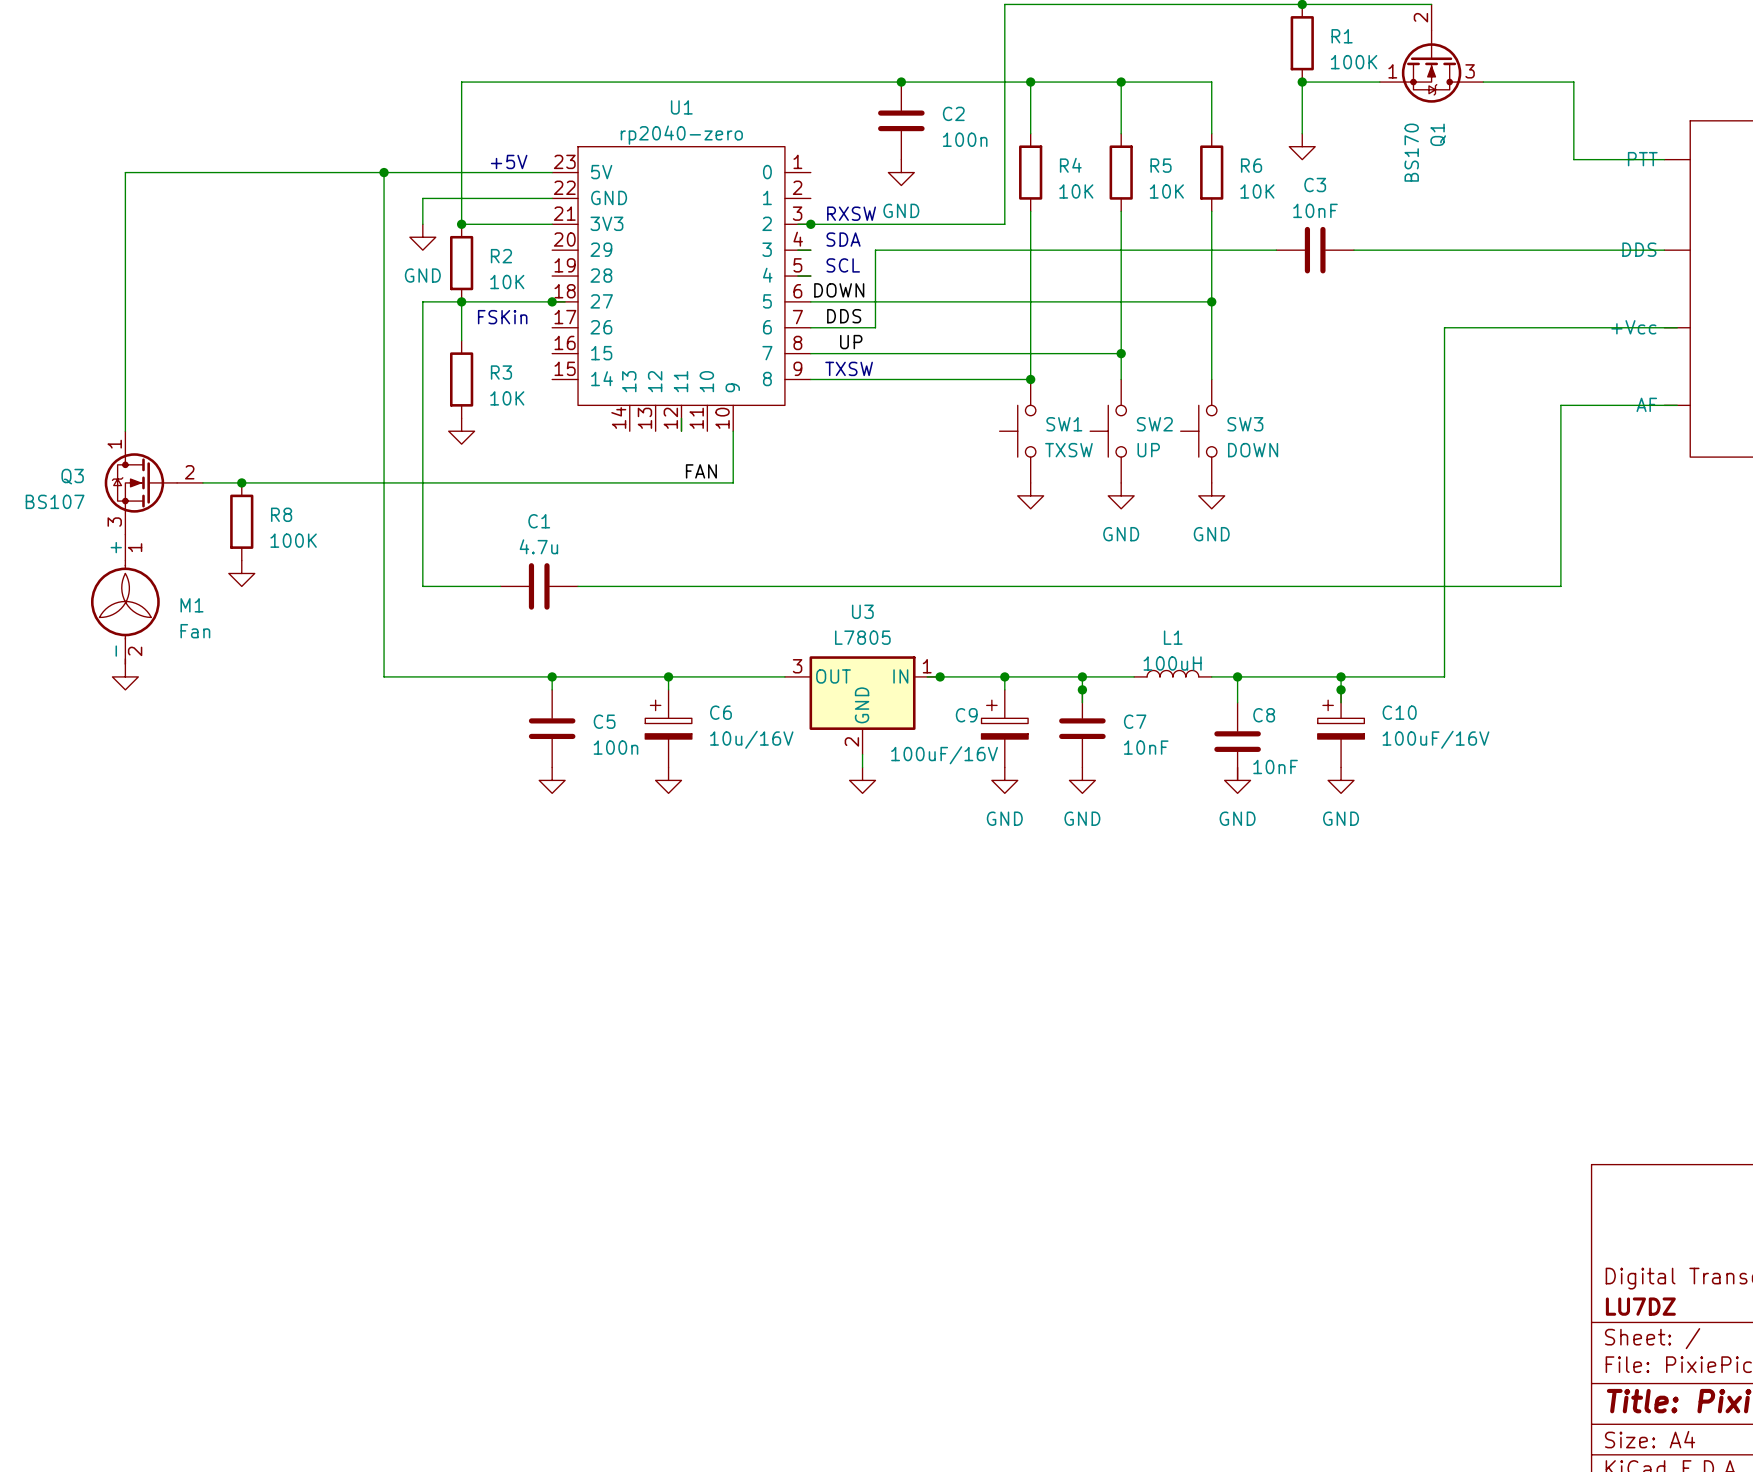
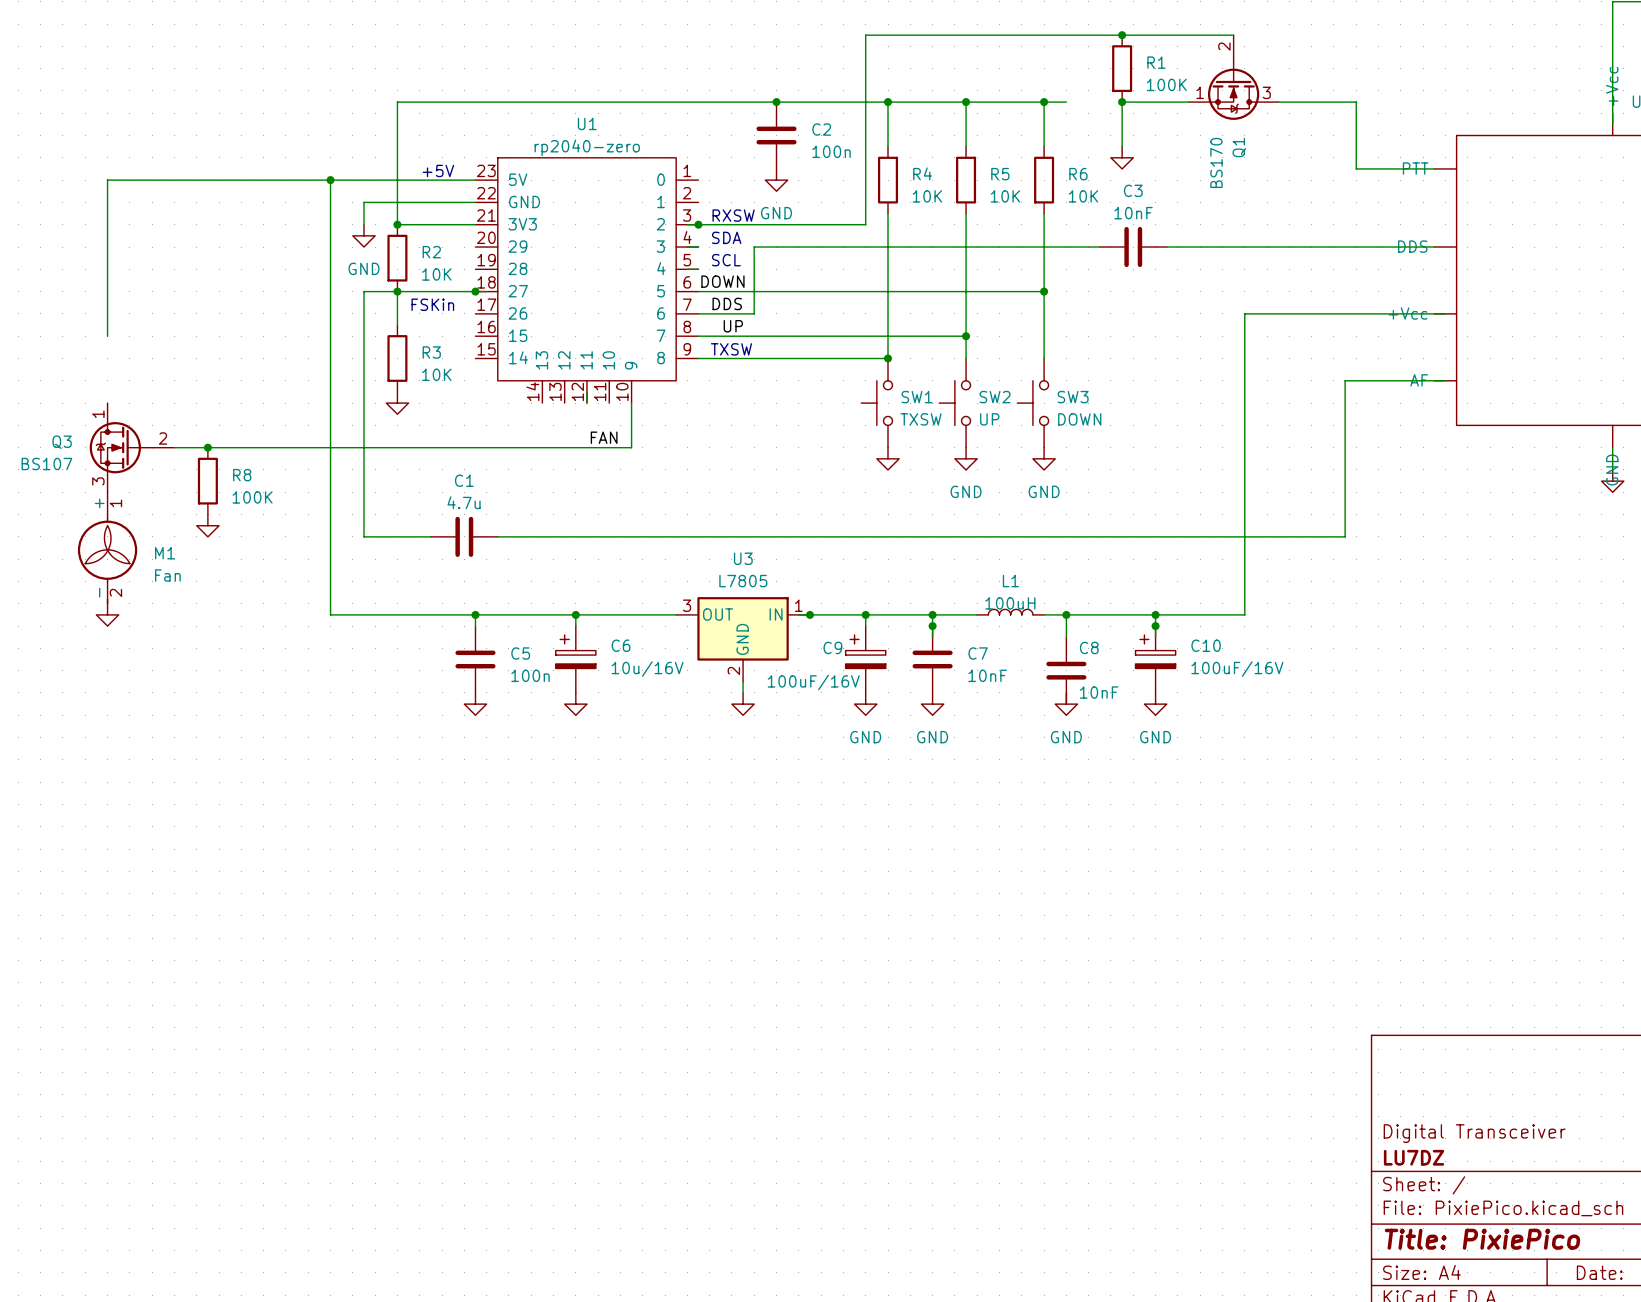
wire: none -> (1044, 102) (1066, 102)
junction: none -> (1044, 102)
wire: (125, 353) (125, 431) -> none

